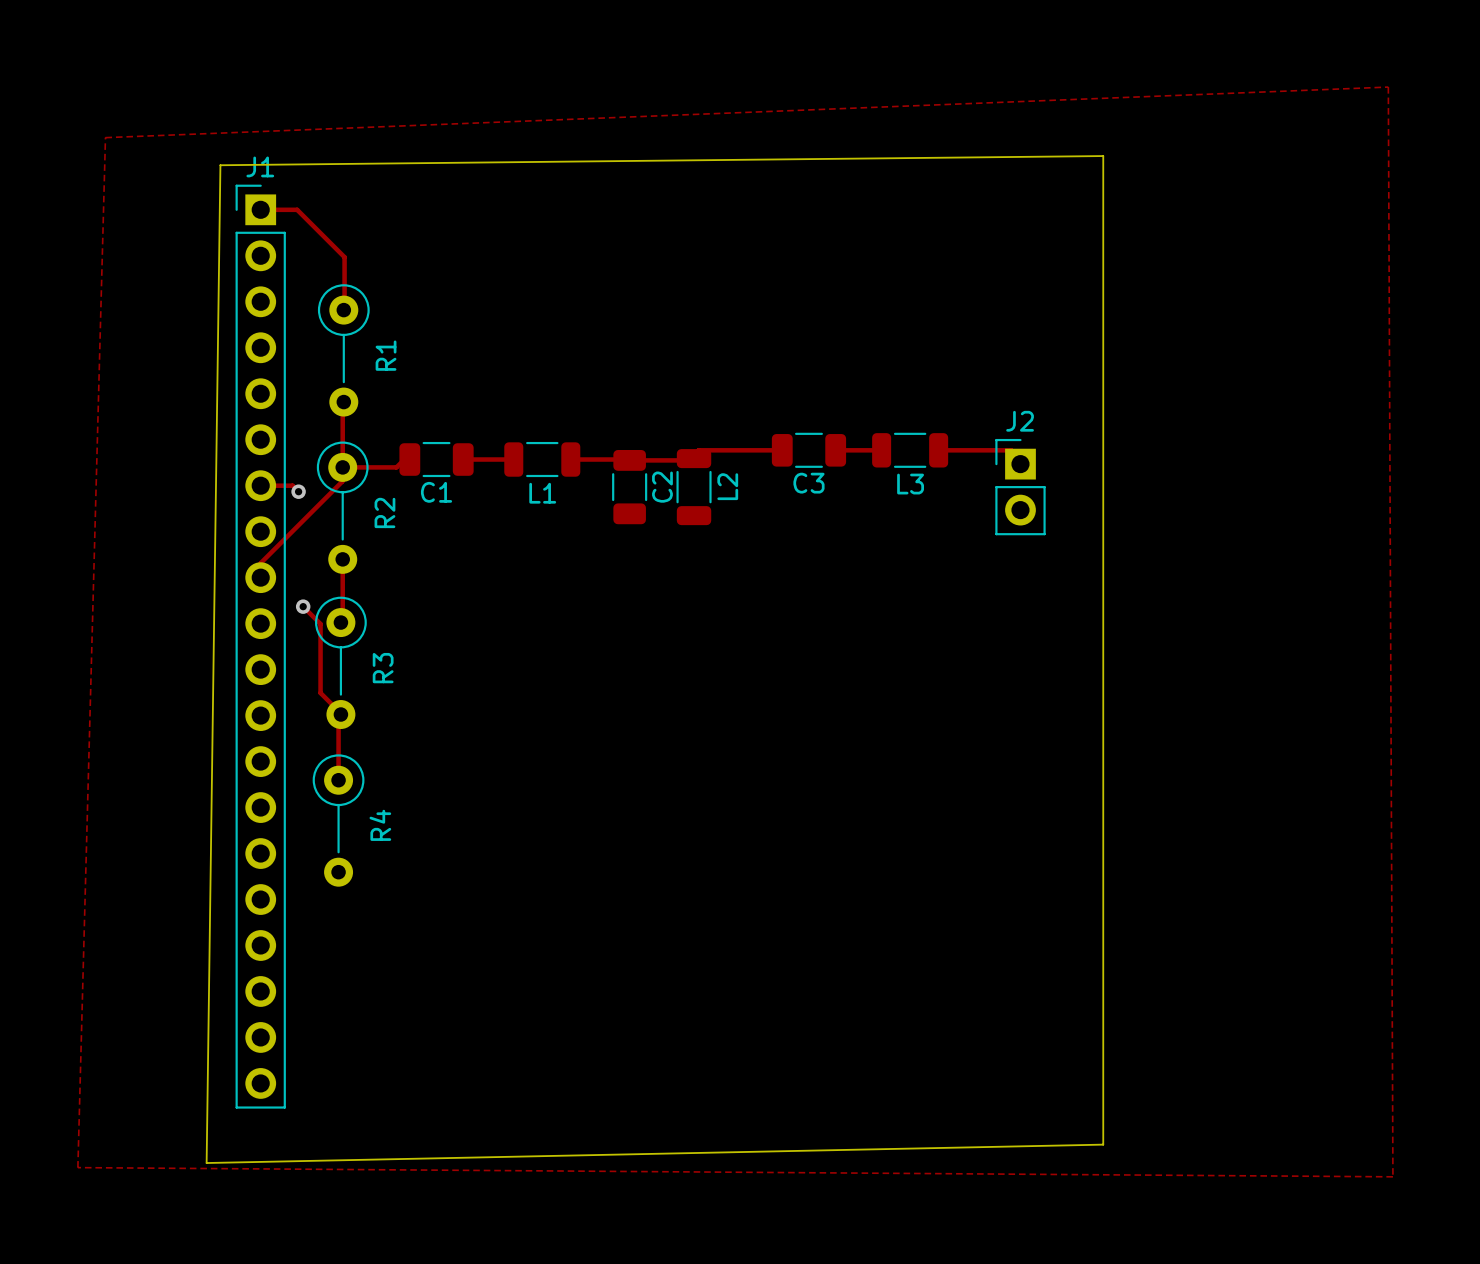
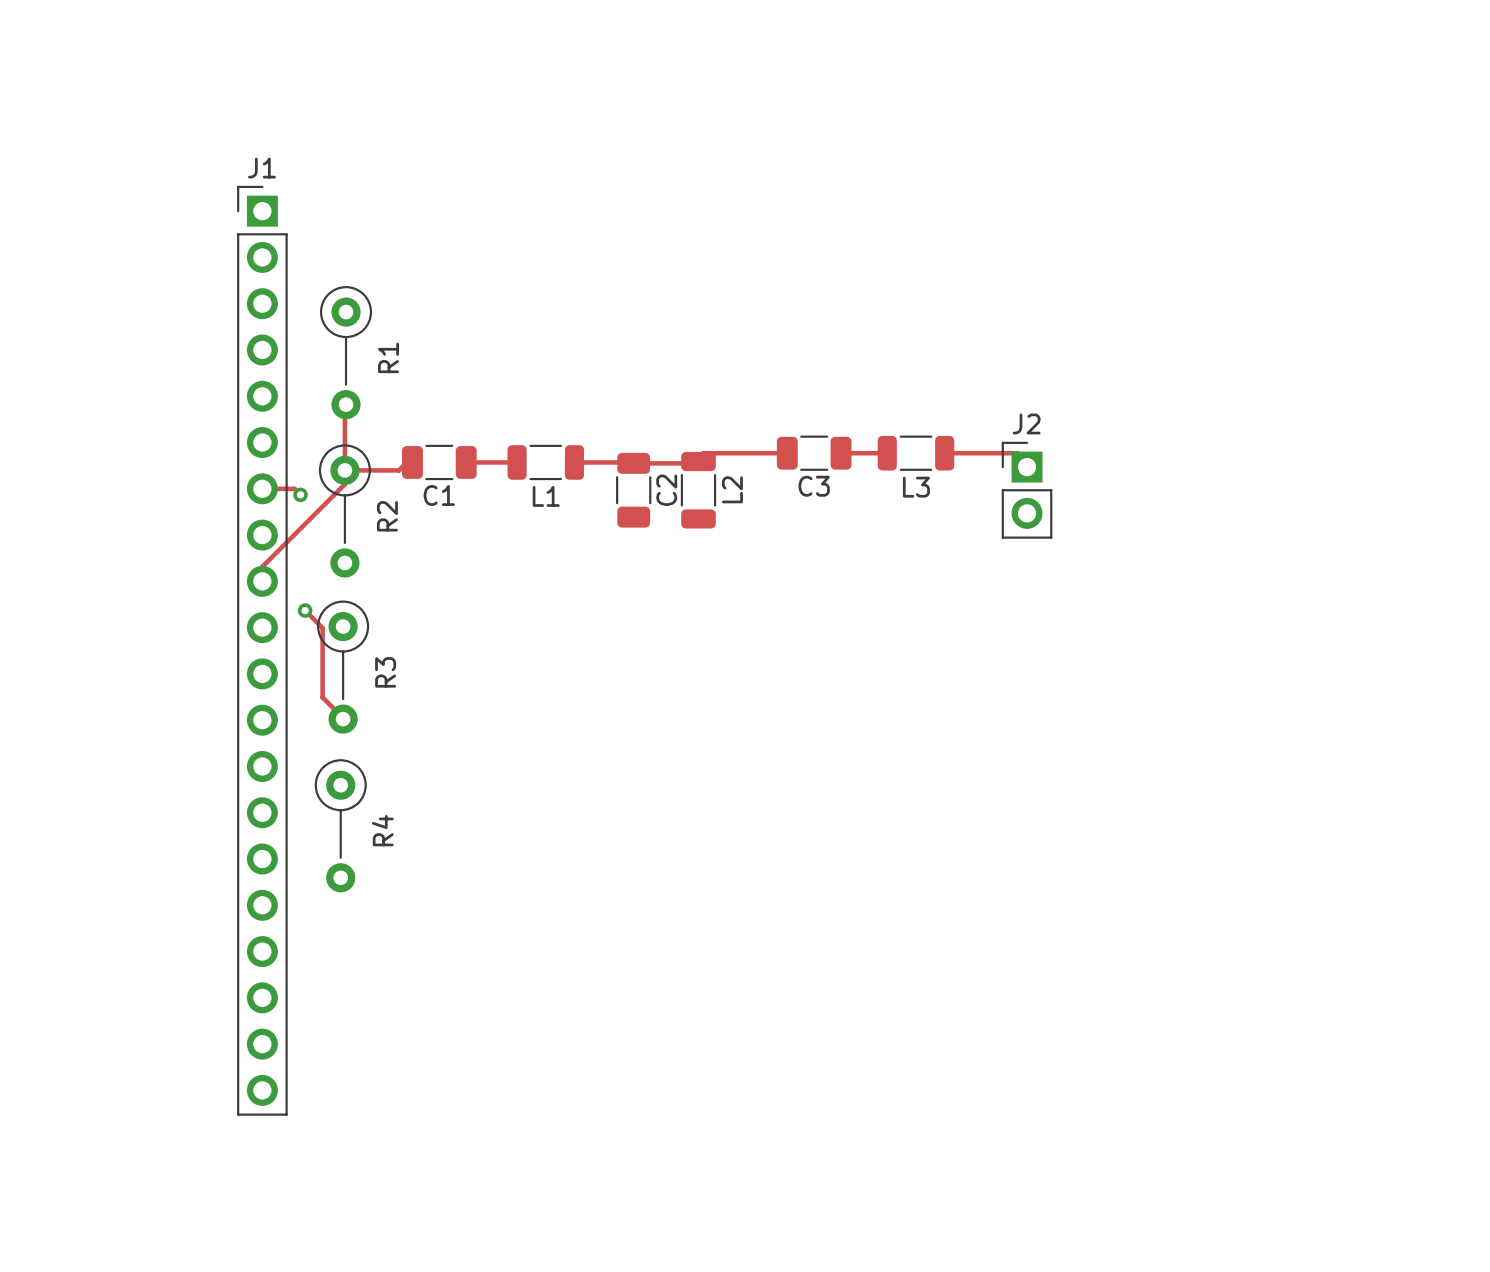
zone outline: (1388, 87) (105, 137) (77, 1167) (1392, 1176) (1388, 87) -> none
board edge: (1103, 156) (1103, 1144) (206, 1163) (220, 165) (1103, 156) -> none
track: (260, 209) (297, 209) (344, 257) (344, 307) -> none
track: (342, 559) (342, 622) (339, 625) -> none
track: (339, 717) (338, 780) -> none

